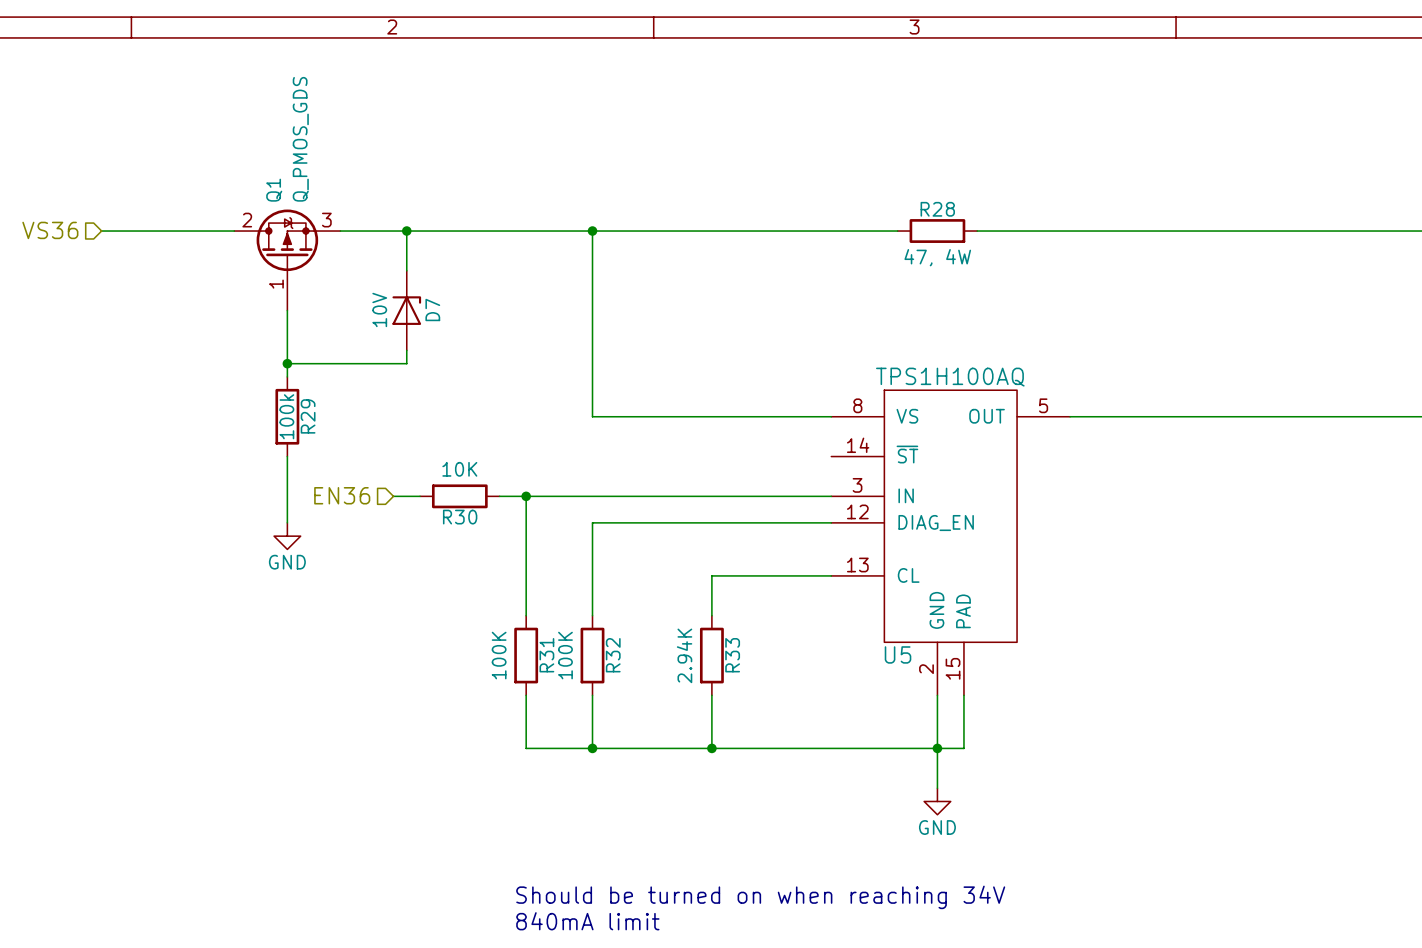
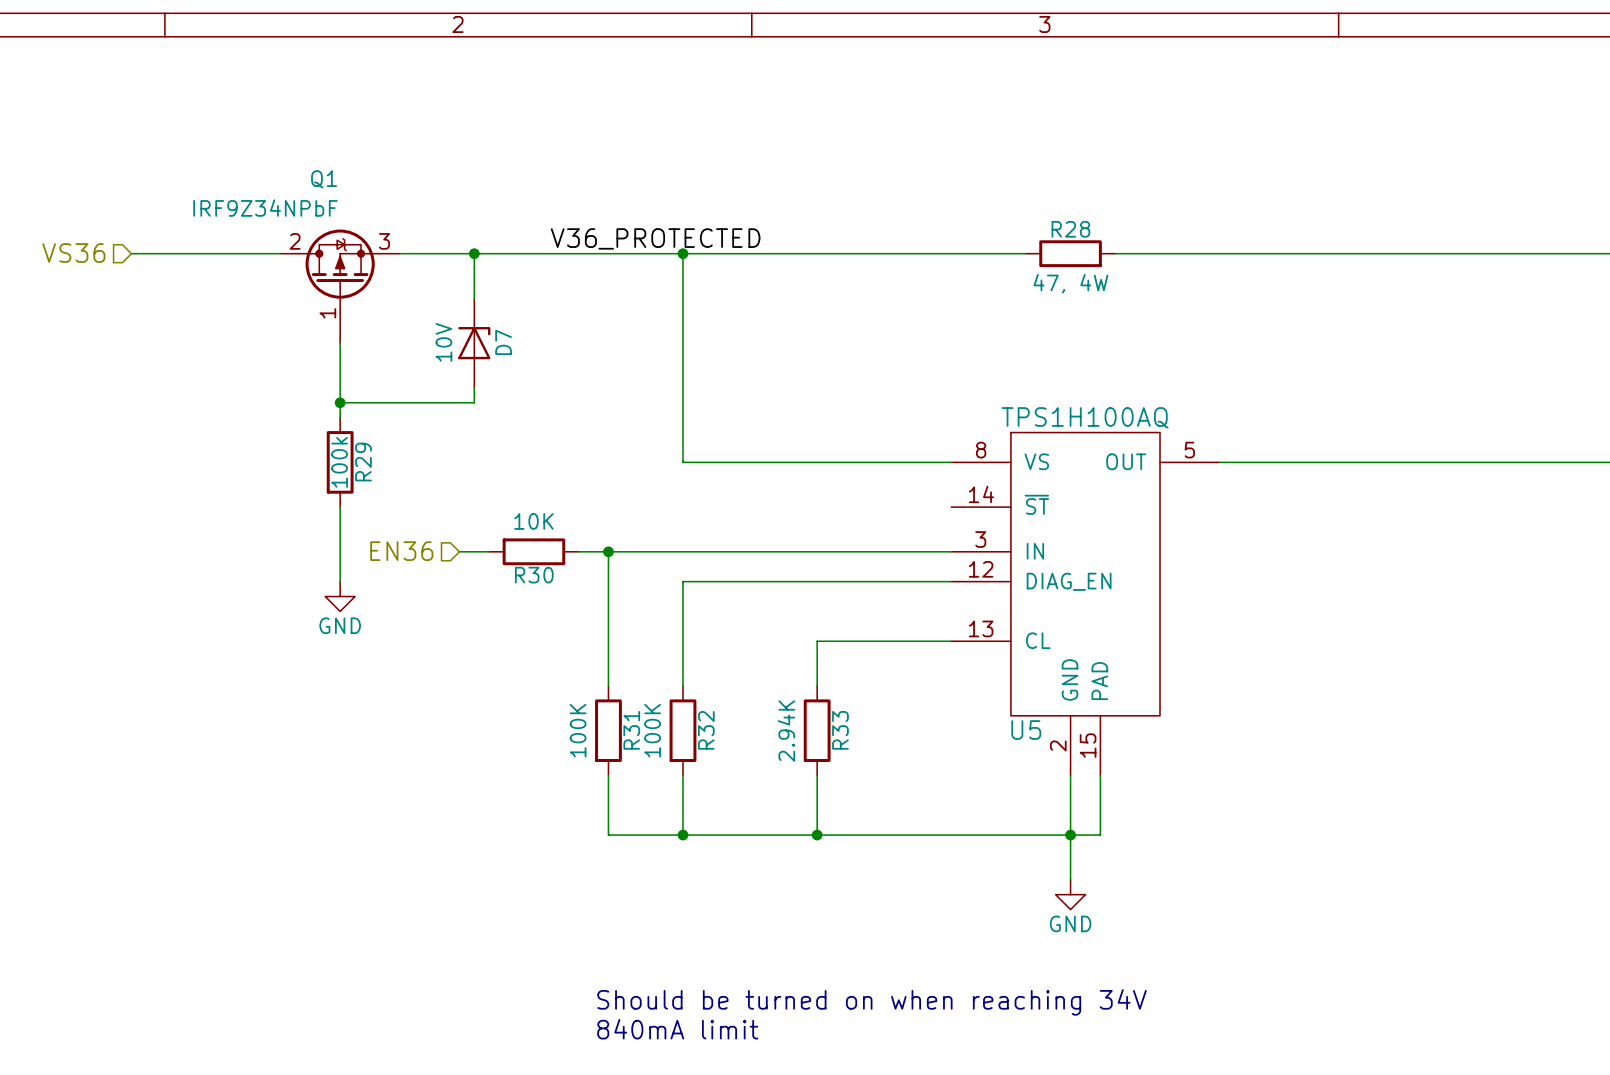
Q1 value: Q_PMOS_GDS (300, 139) -> IRF9Z34NPbF (265, 208)
Q1 name rotation: 0° (274, 190) -> 90° clockwise (324, 179)
label: none -> V36_PROTECTED (655, 238)

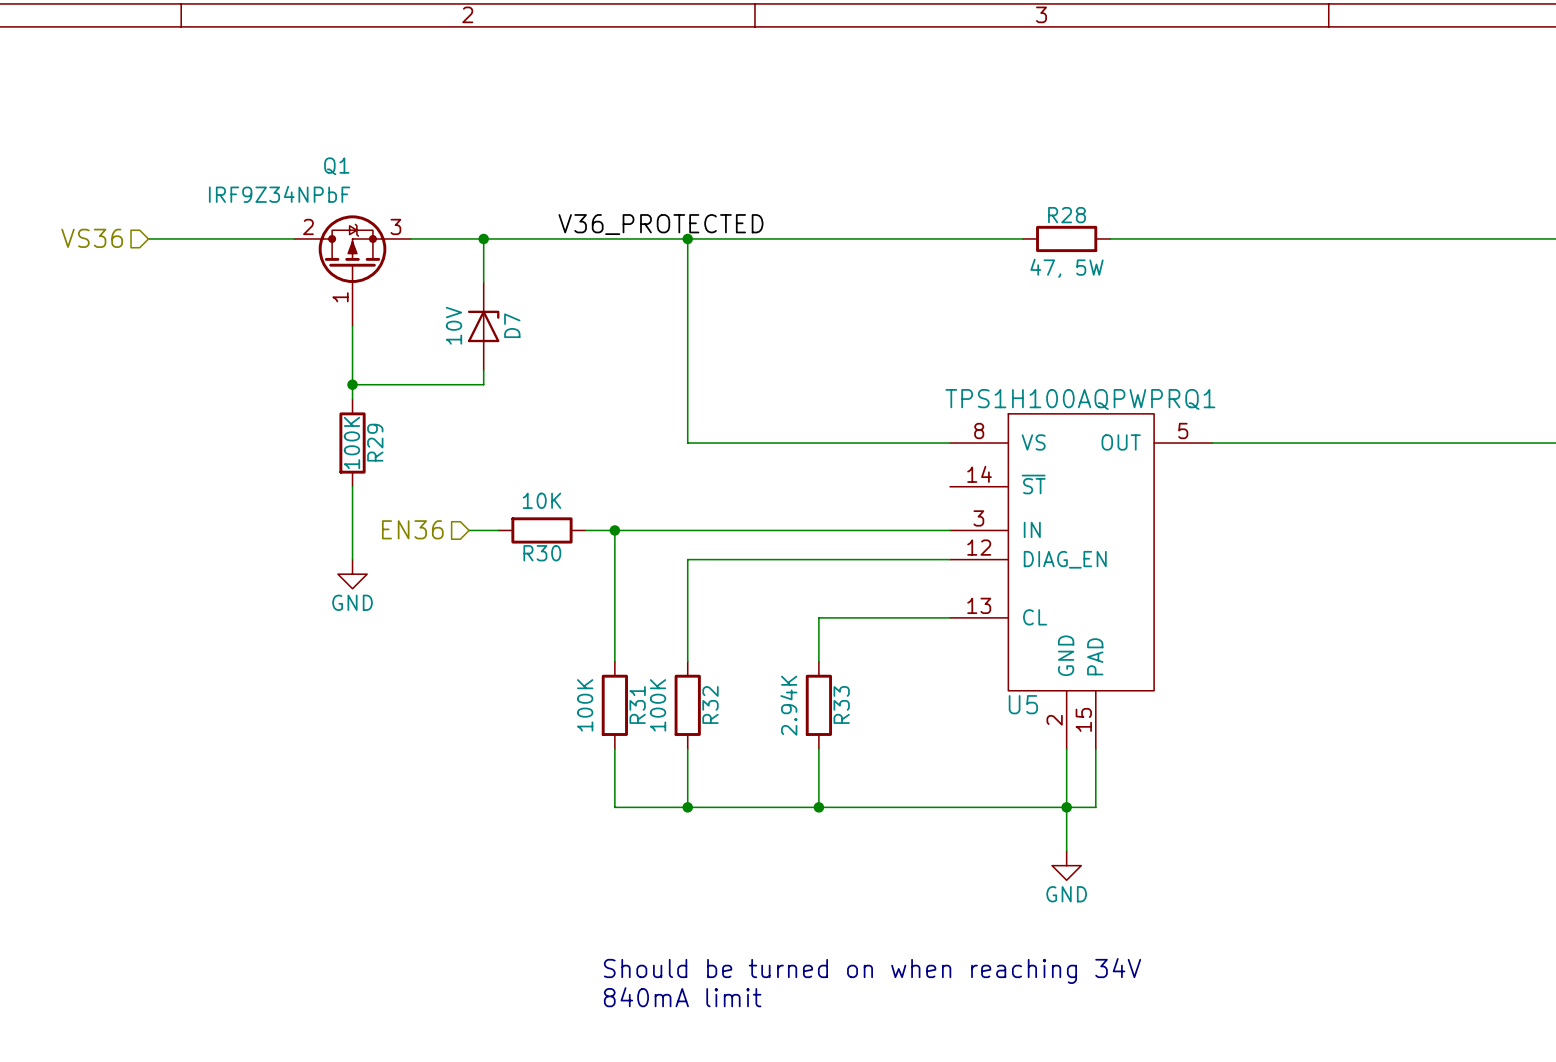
R28 value: 47, 4W (1070, 283) -> 47, 5W (1067, 268)
U5 value: TPS1H100AQ (1085, 417) -> TPS1H100AQPWPRQ1 (1080, 399)
R29 value: 100k (339, 462) -> 100K (351, 443)

